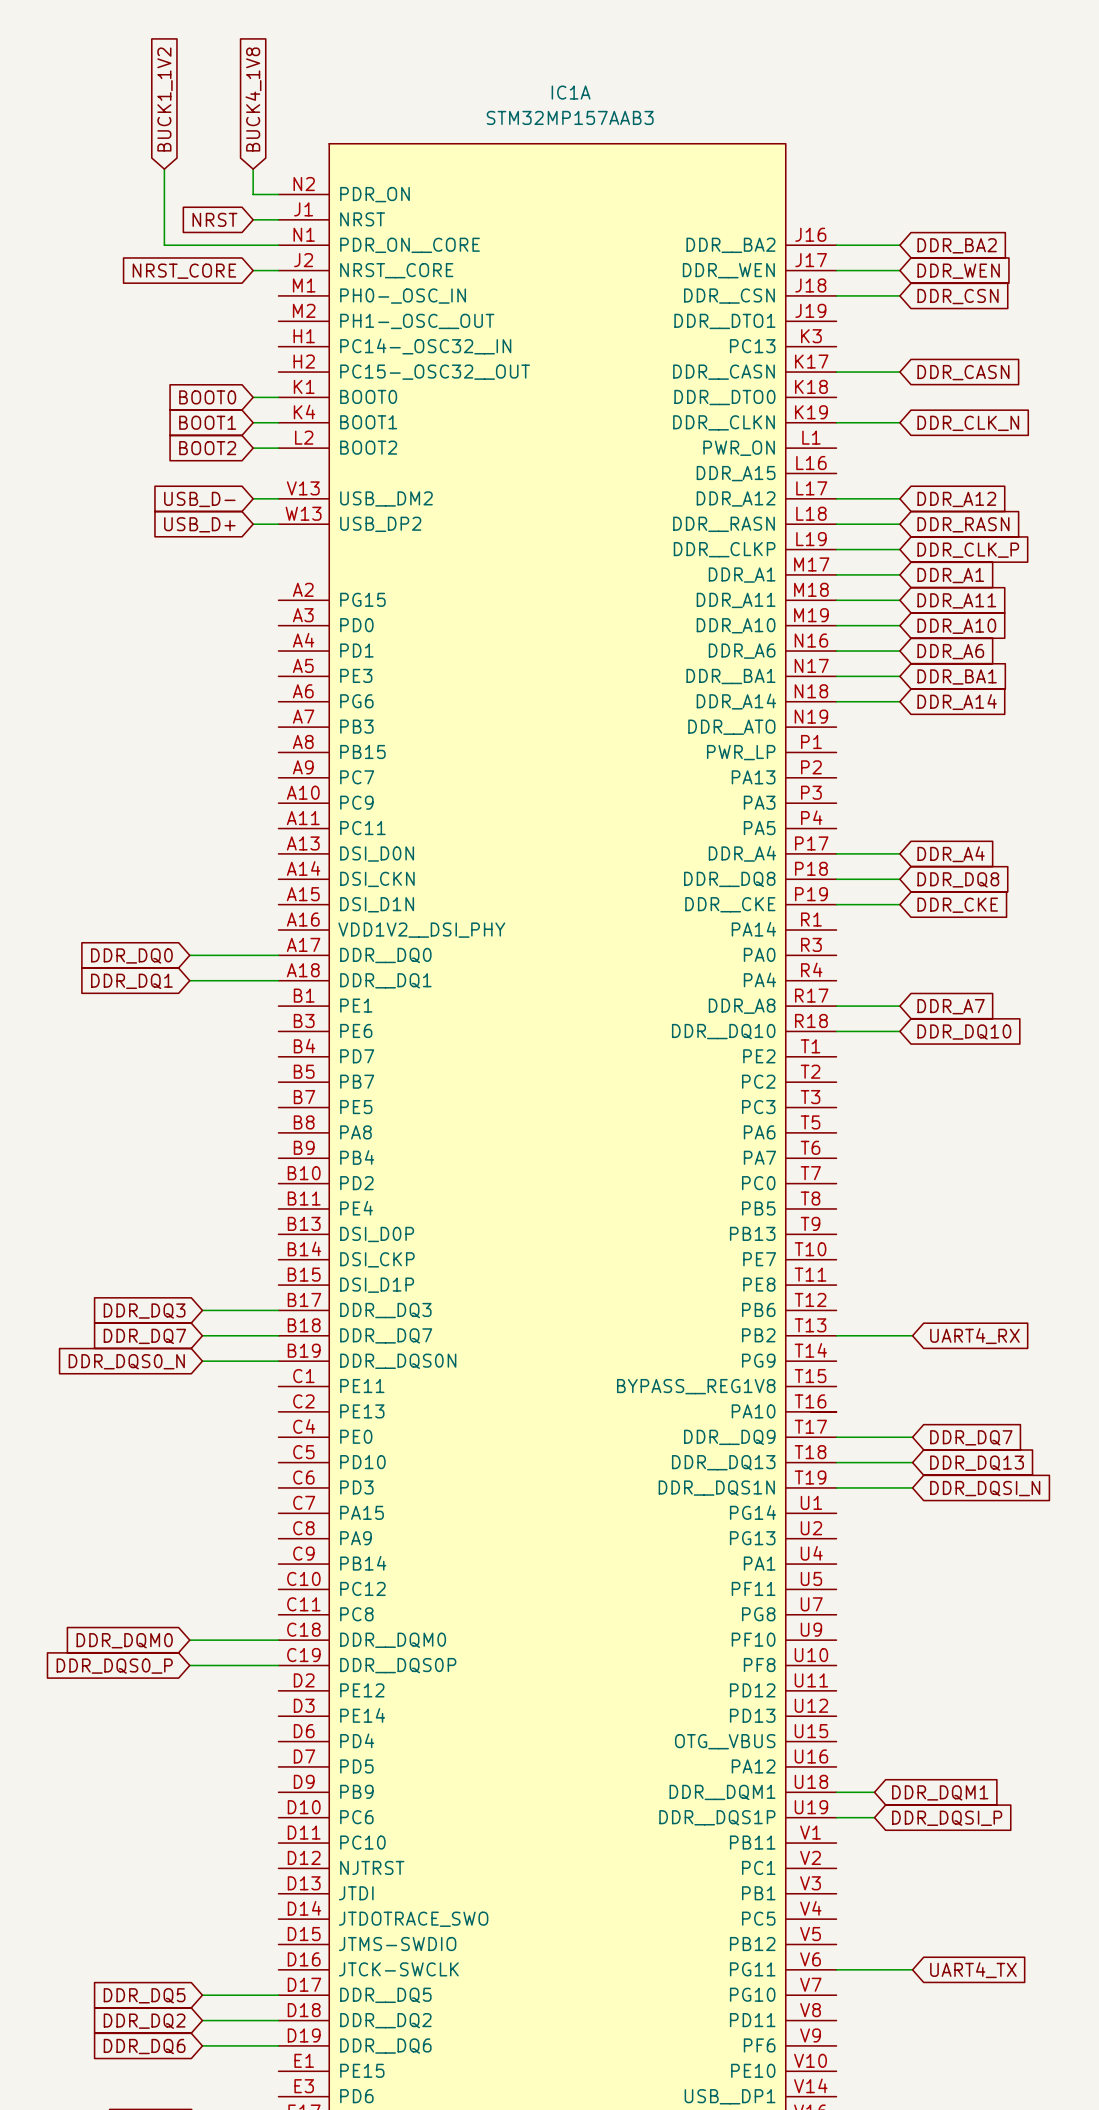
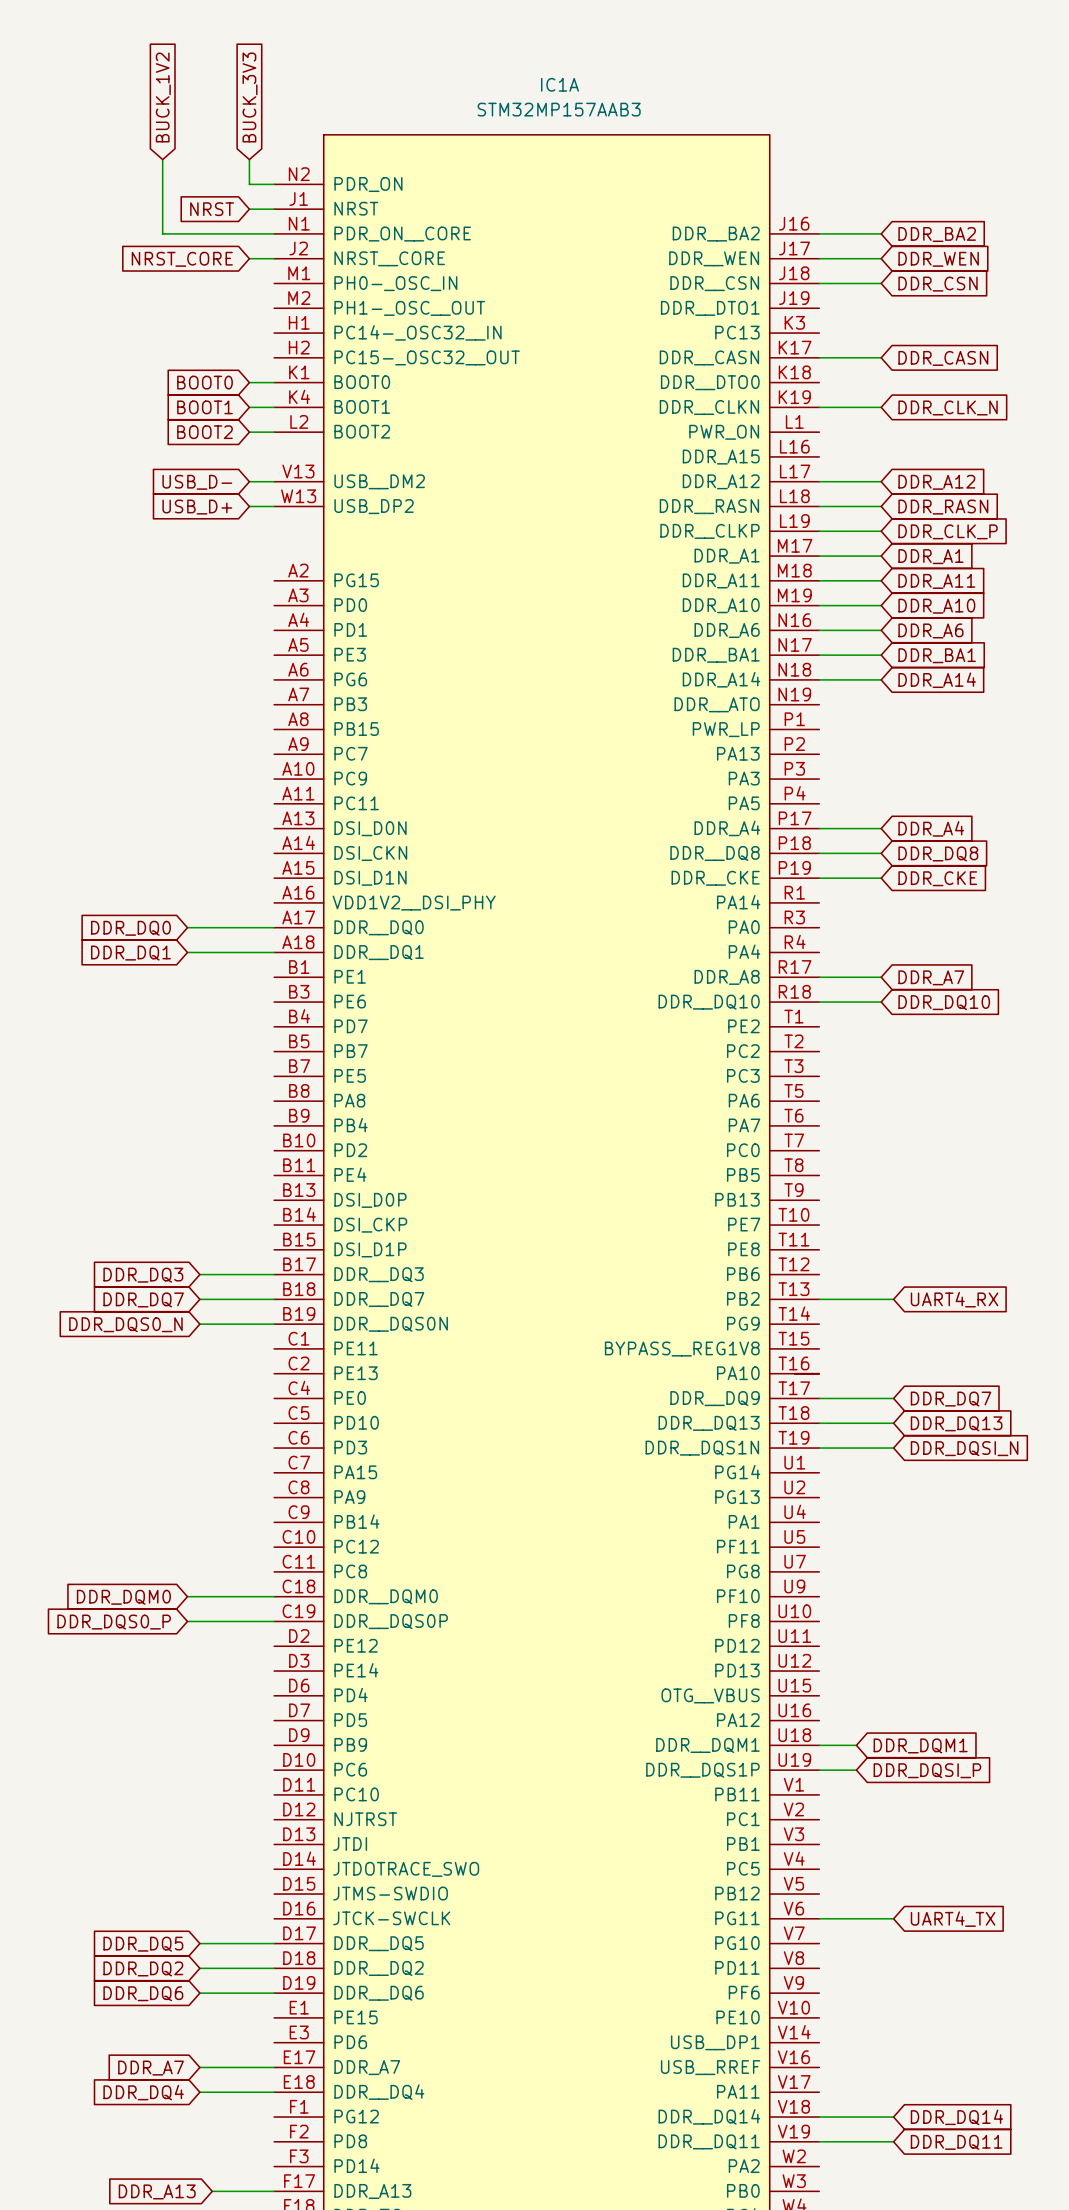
global label: BUCK1_1V2 (164, 99) -> BUCK_1V2 (163, 97)
global label: BUCK4_1V8 (253, 99) -> BUCK_3V3 (250, 97)

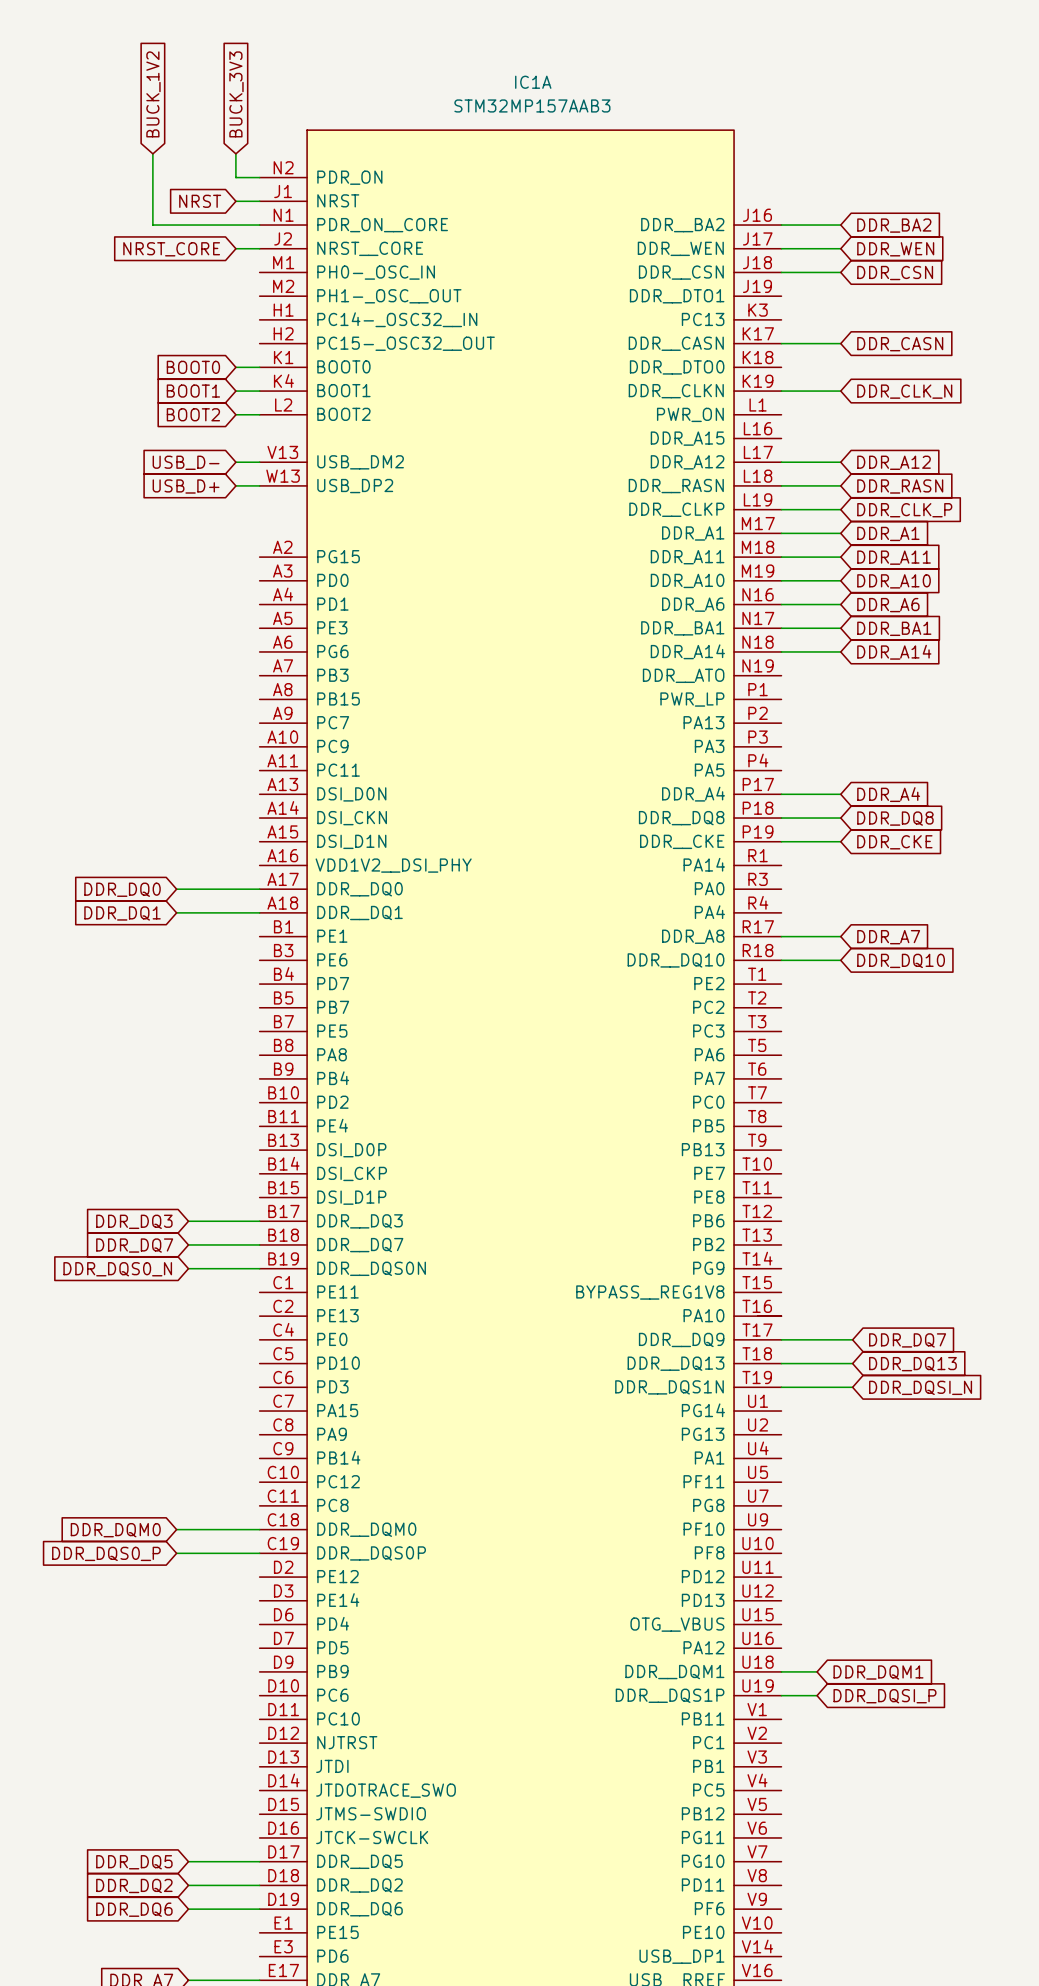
wire: (819, 1299) (893, 1299) -> none
global label: UART4_RX (954, 1299) -> none
wire: (819, 1918) (893, 1918) -> none
global label: UART4_TX (953, 1919) -> none

